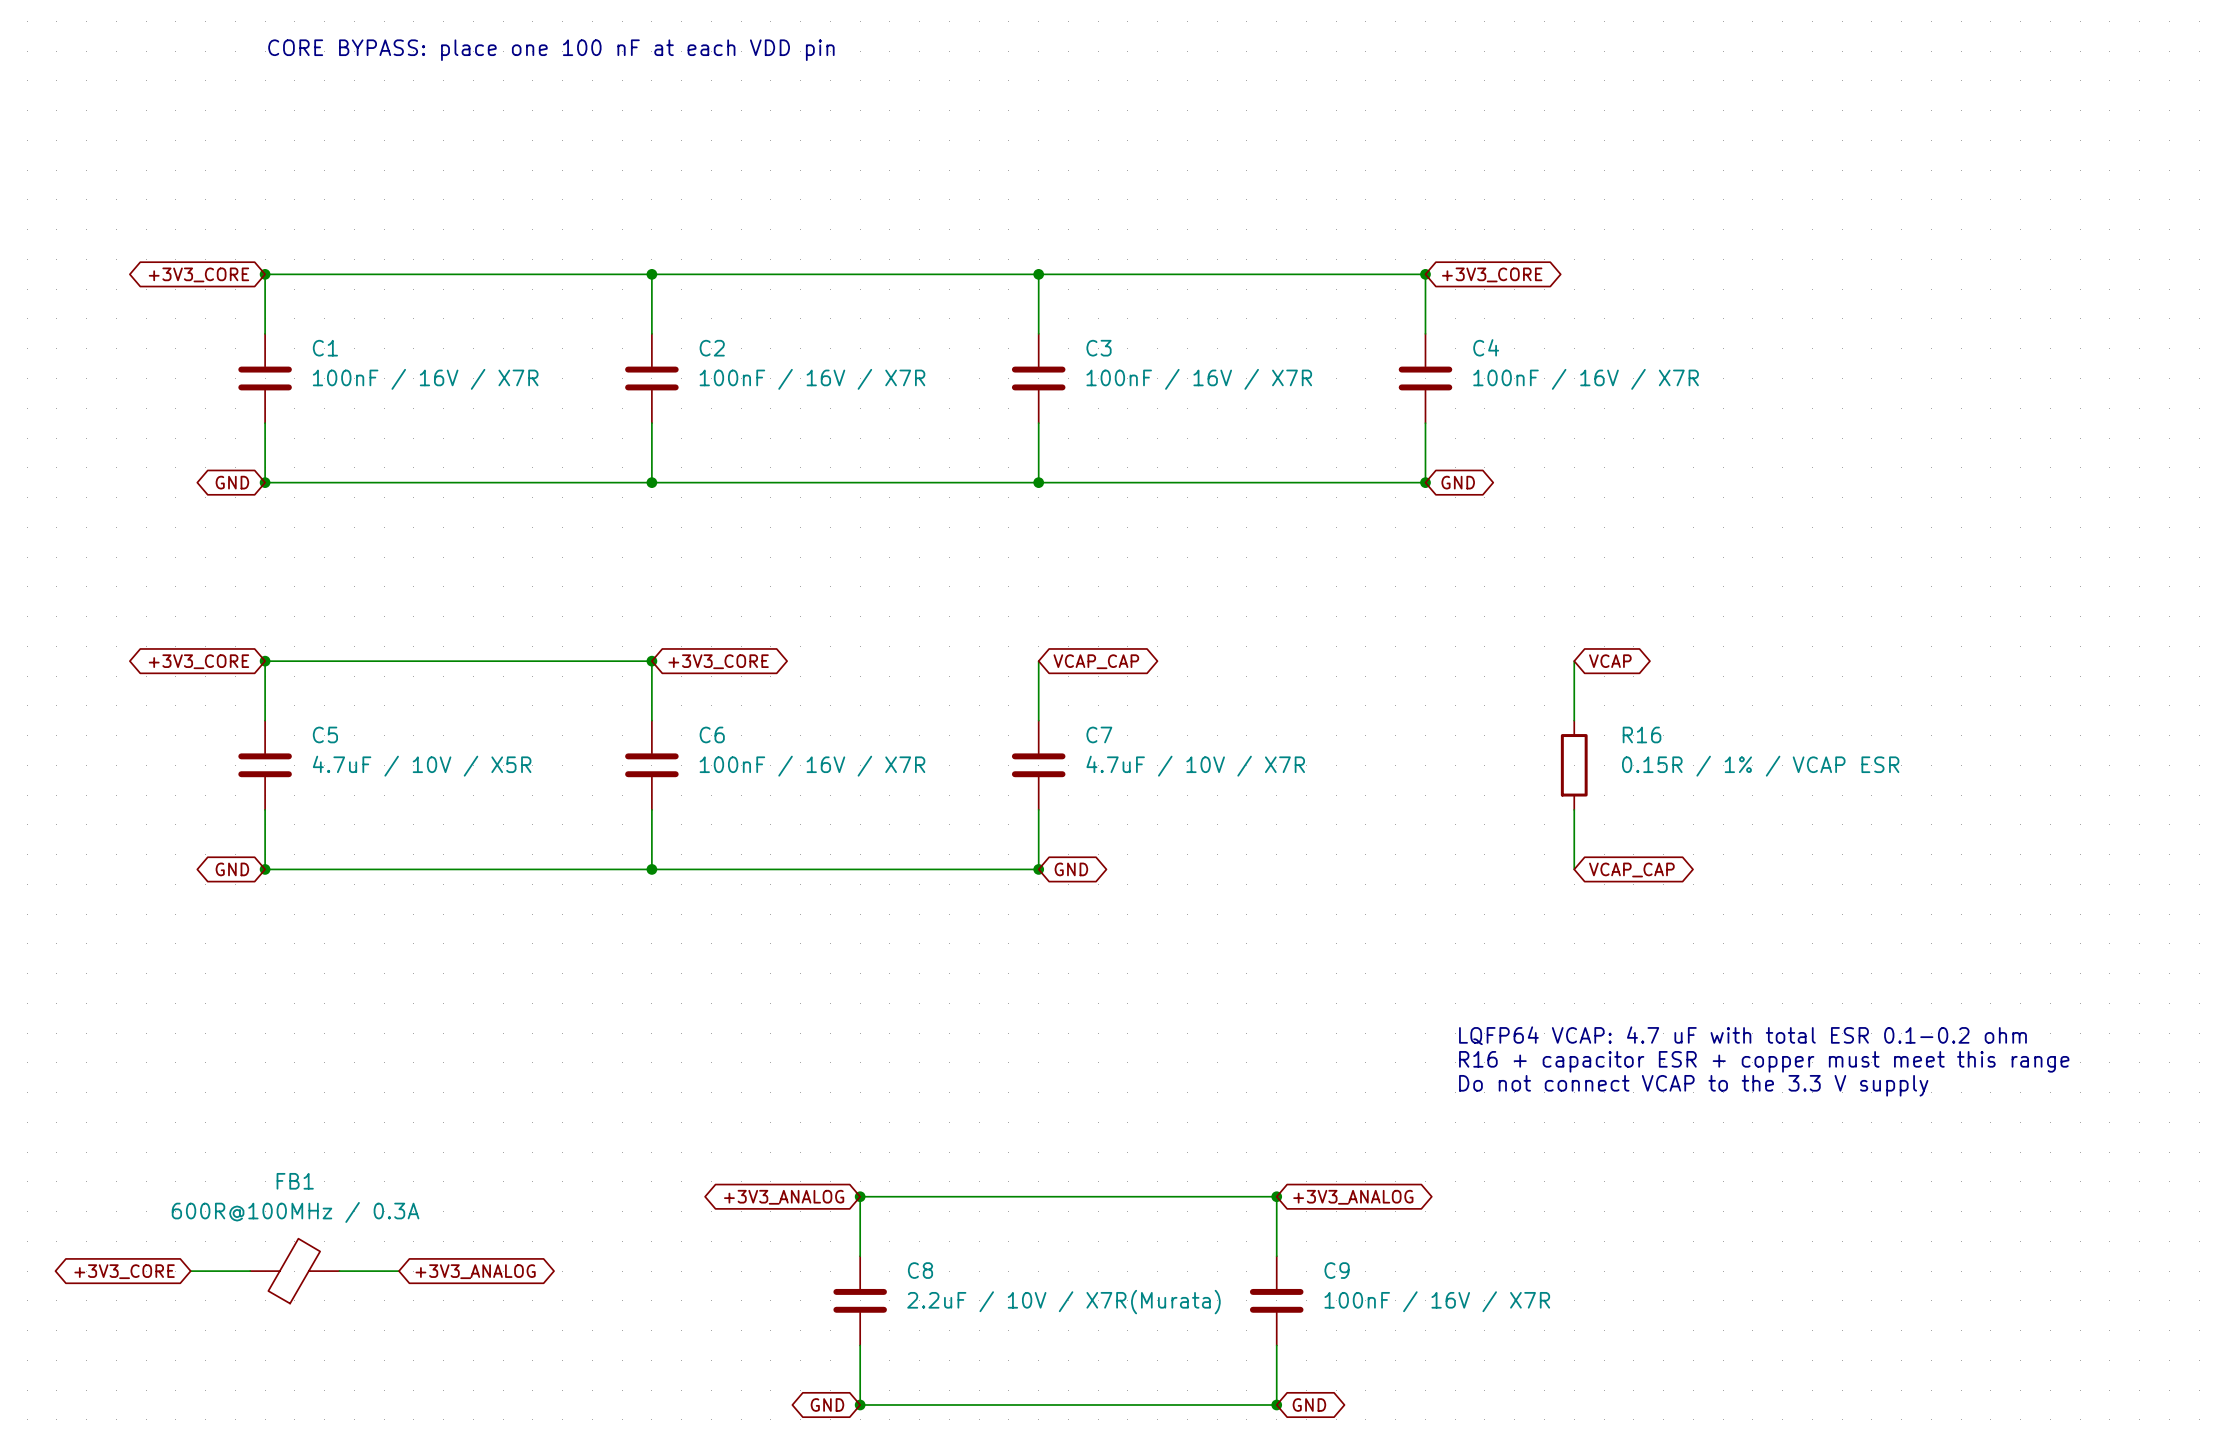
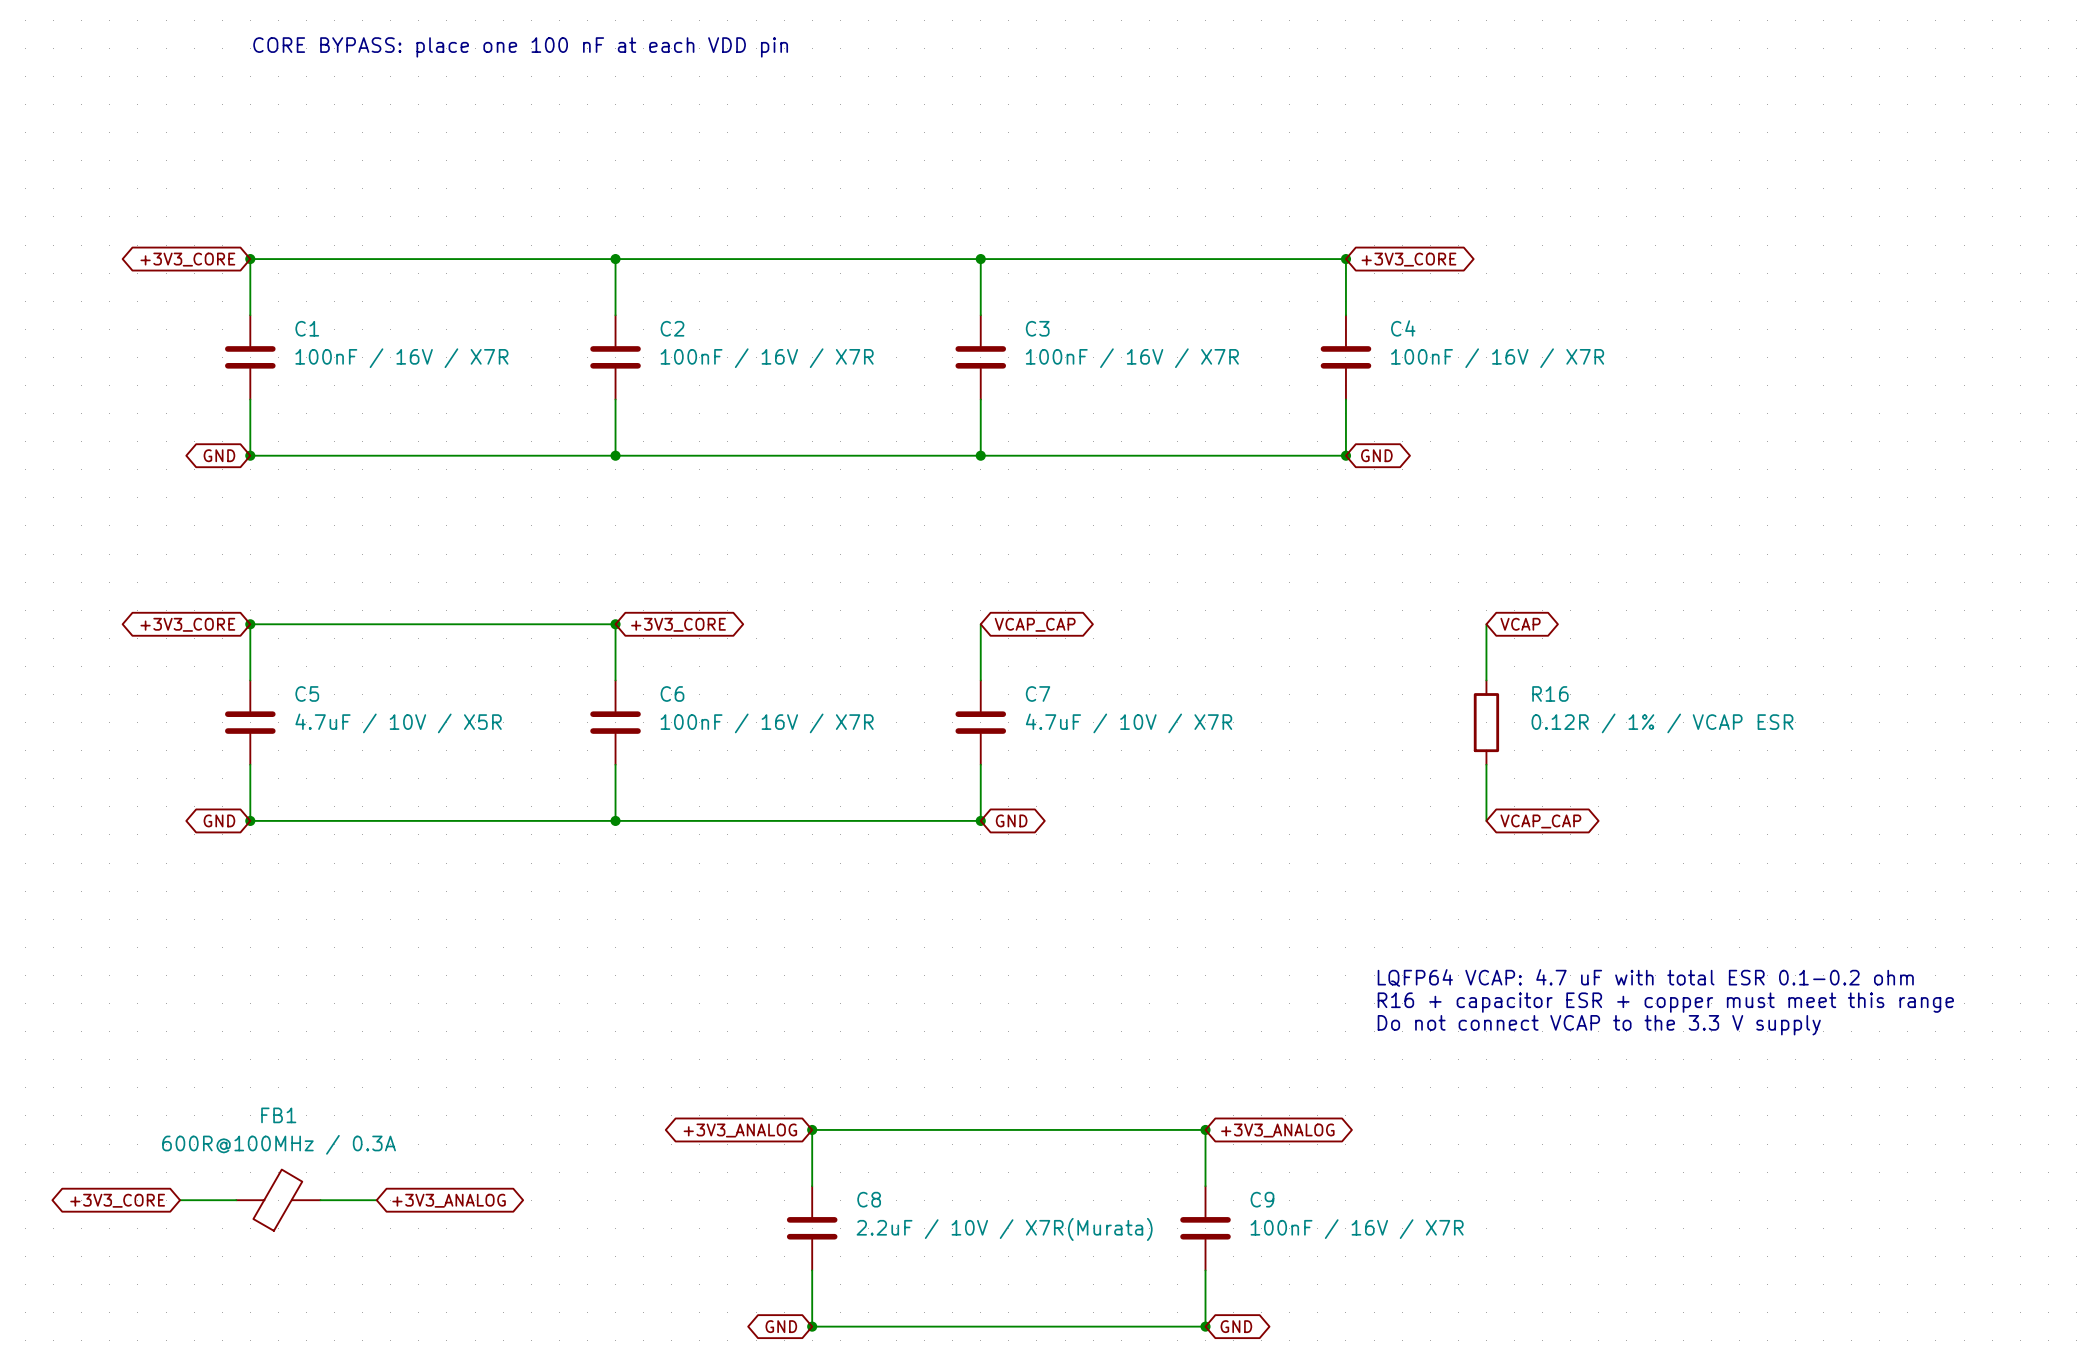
R16 value: 0.15R / 1% / VCAP ESR (1760, 766) -> 0.12R / 1% / VCAP ESR (1662, 723)

